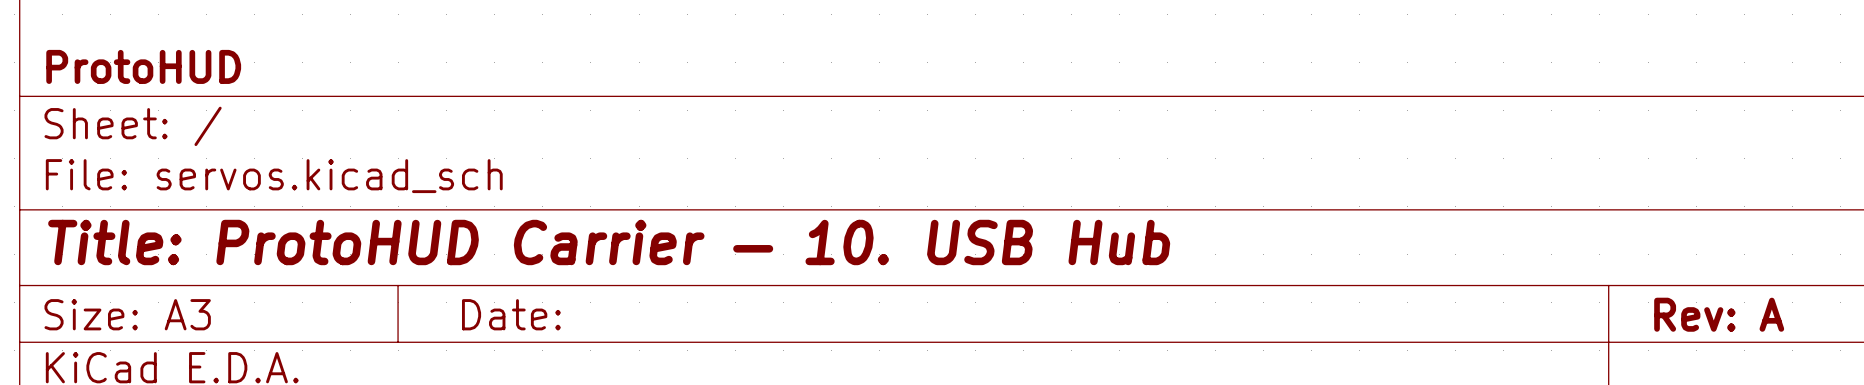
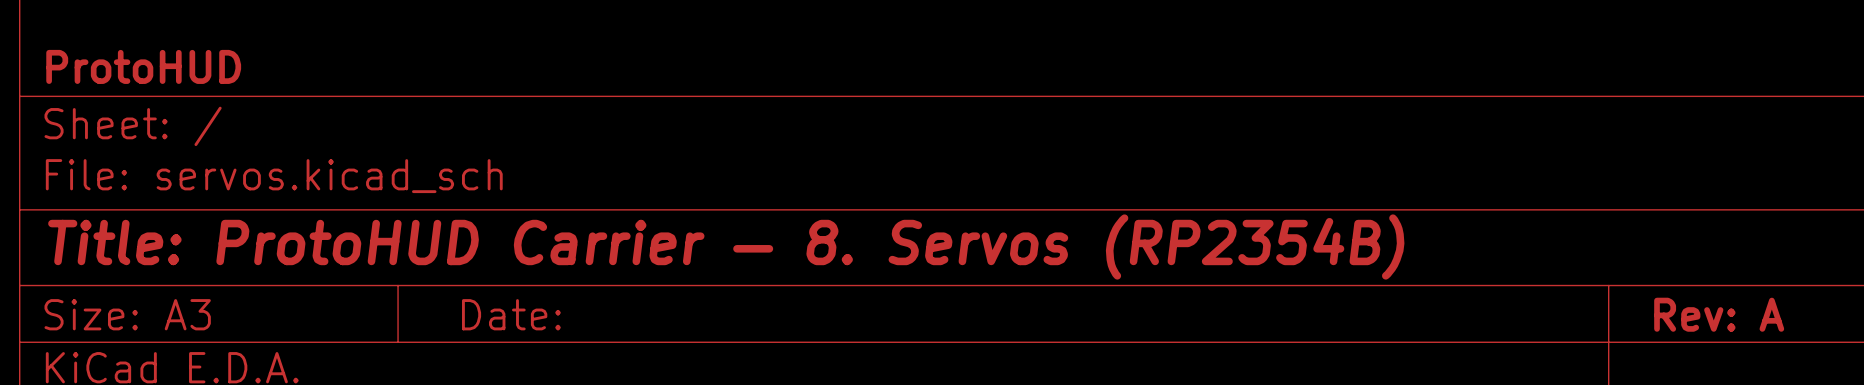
title block: Title: ProtoHUD Carrier — 10. USB Hub (609, 242) -> Title: ProtoHUD Carrier — 8. Servos (RP2354B) (726, 247)

